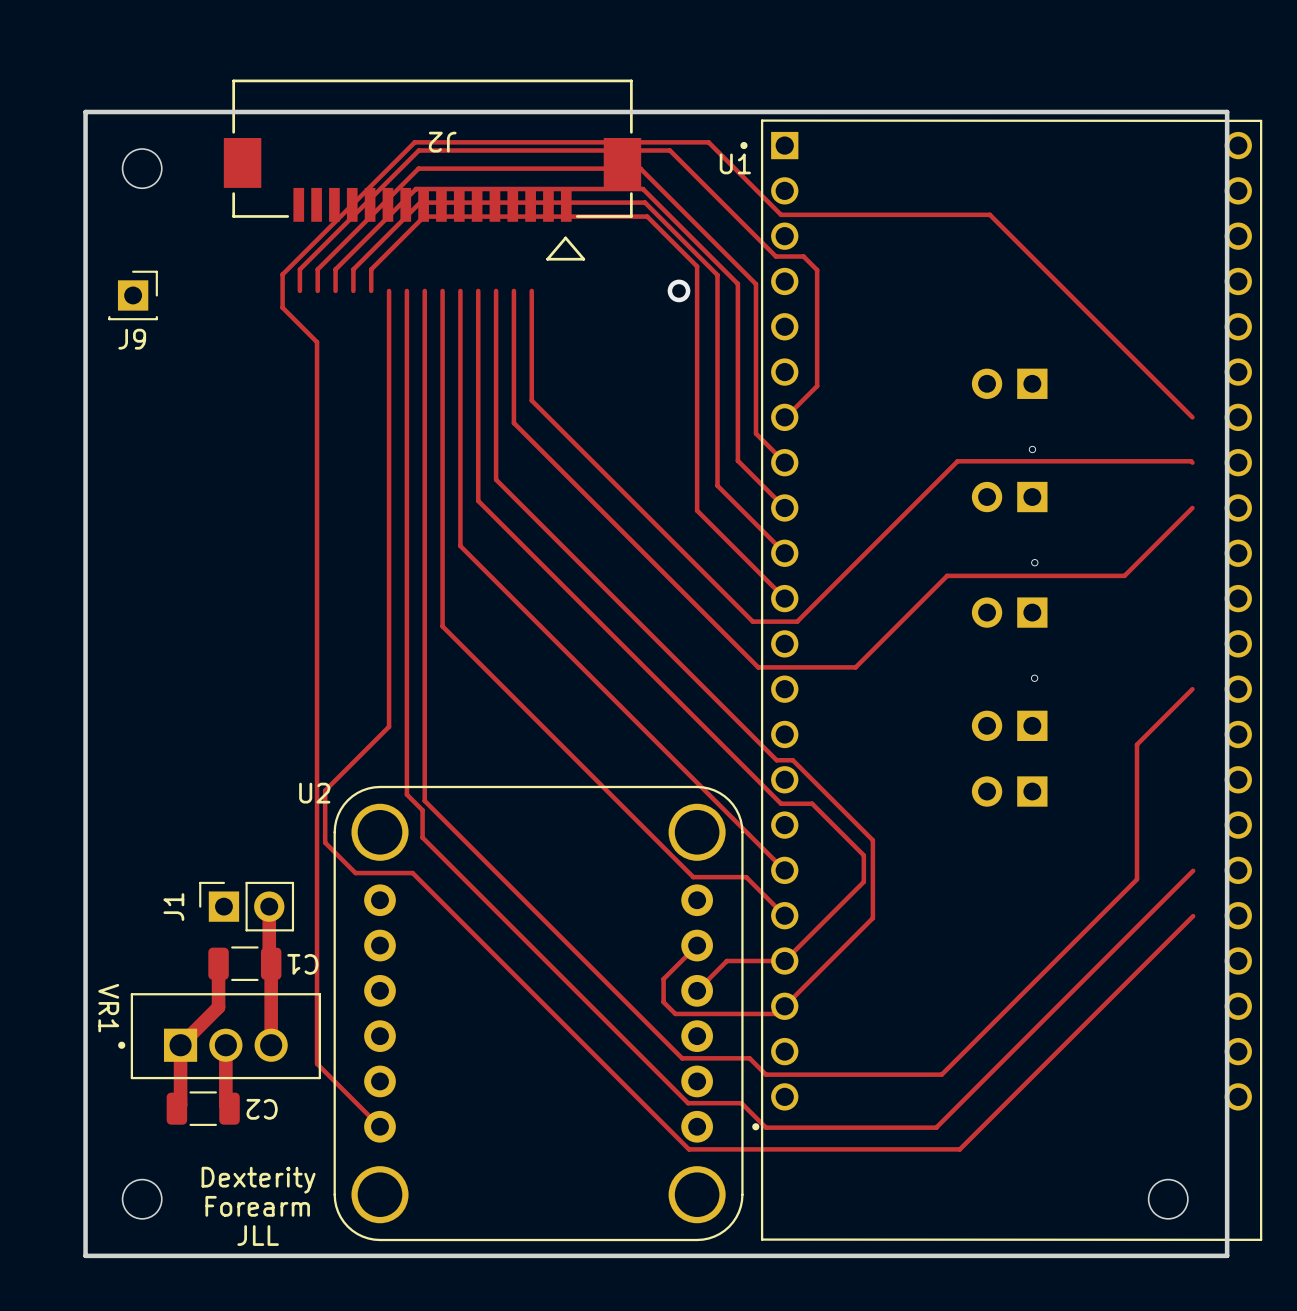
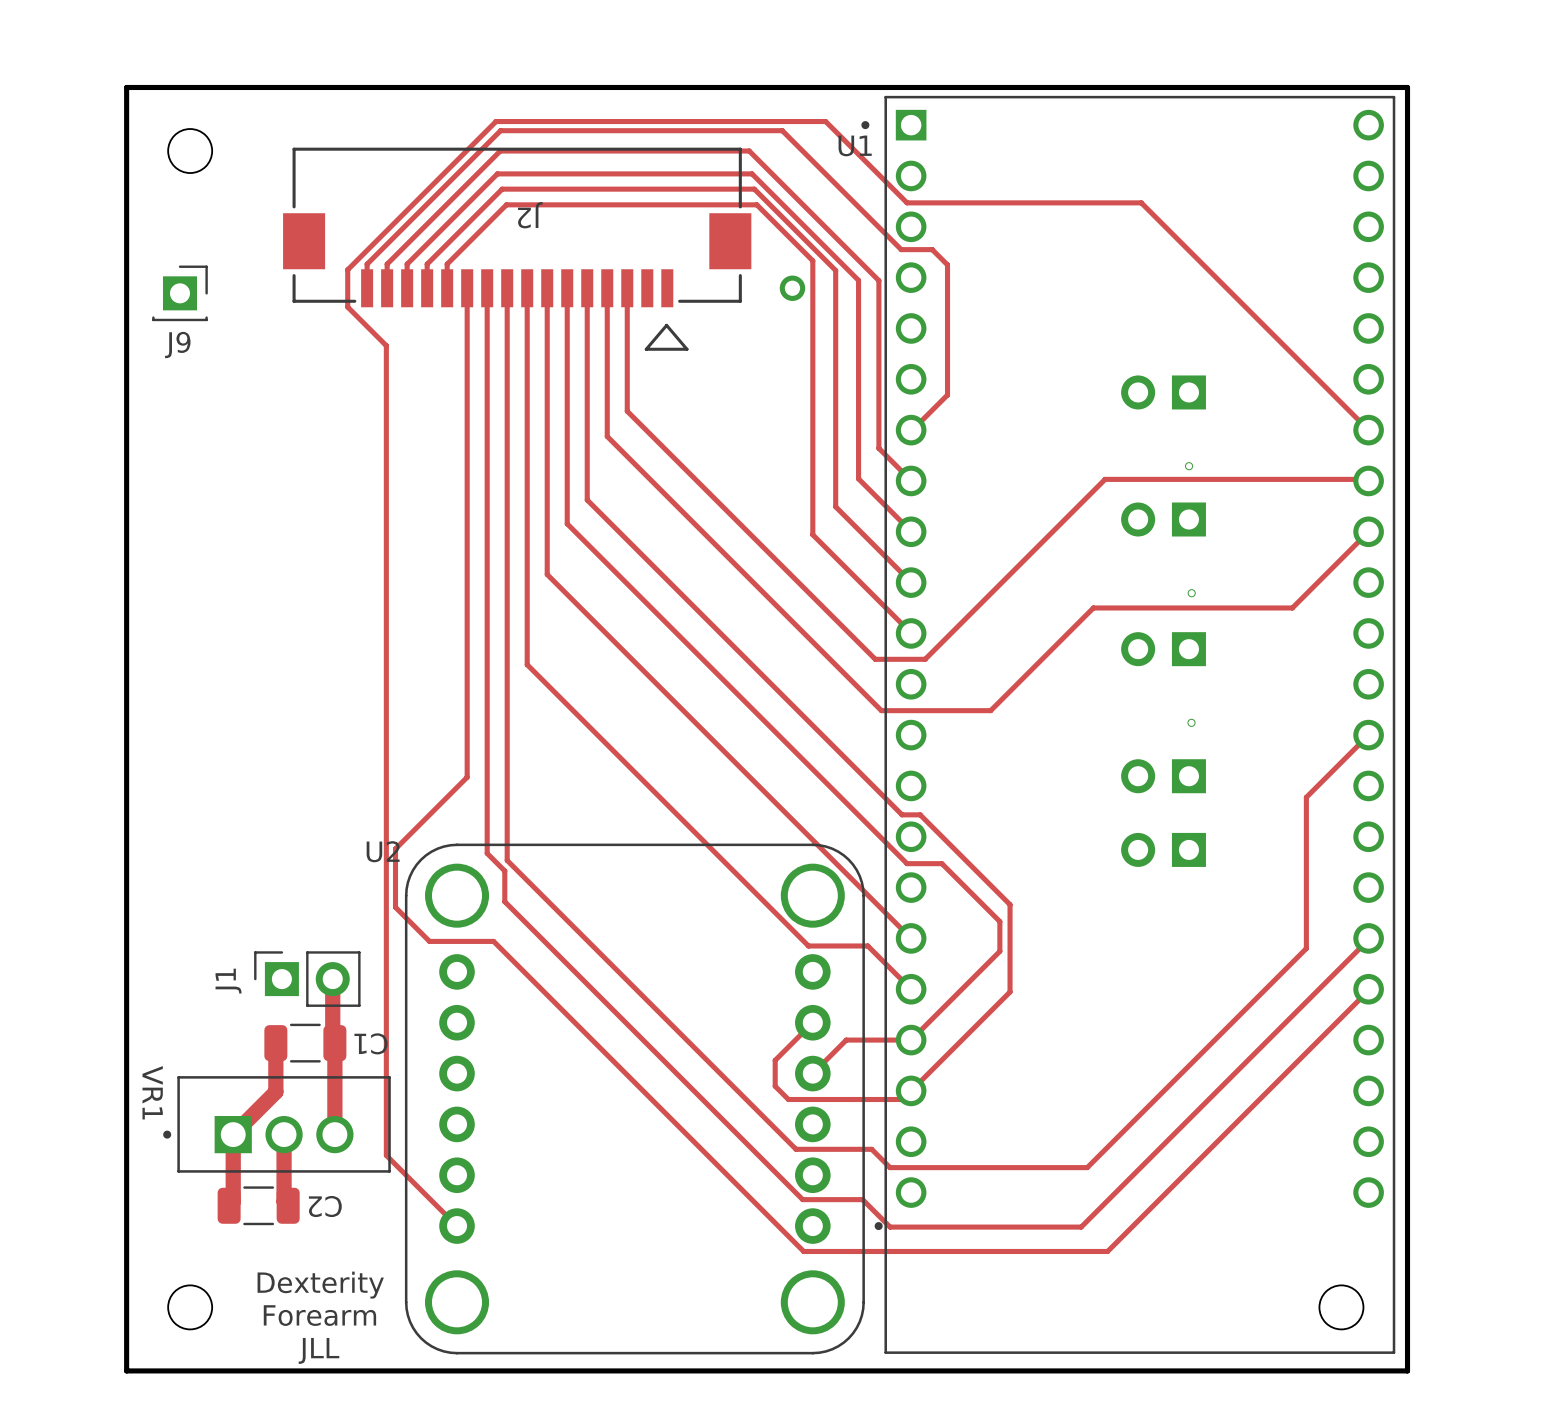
U1 footprint: [740, 119, 1263, 1241] -> [861, 95, 1396, 1354]
J2 position: (432, 170) -> (517, 249)

